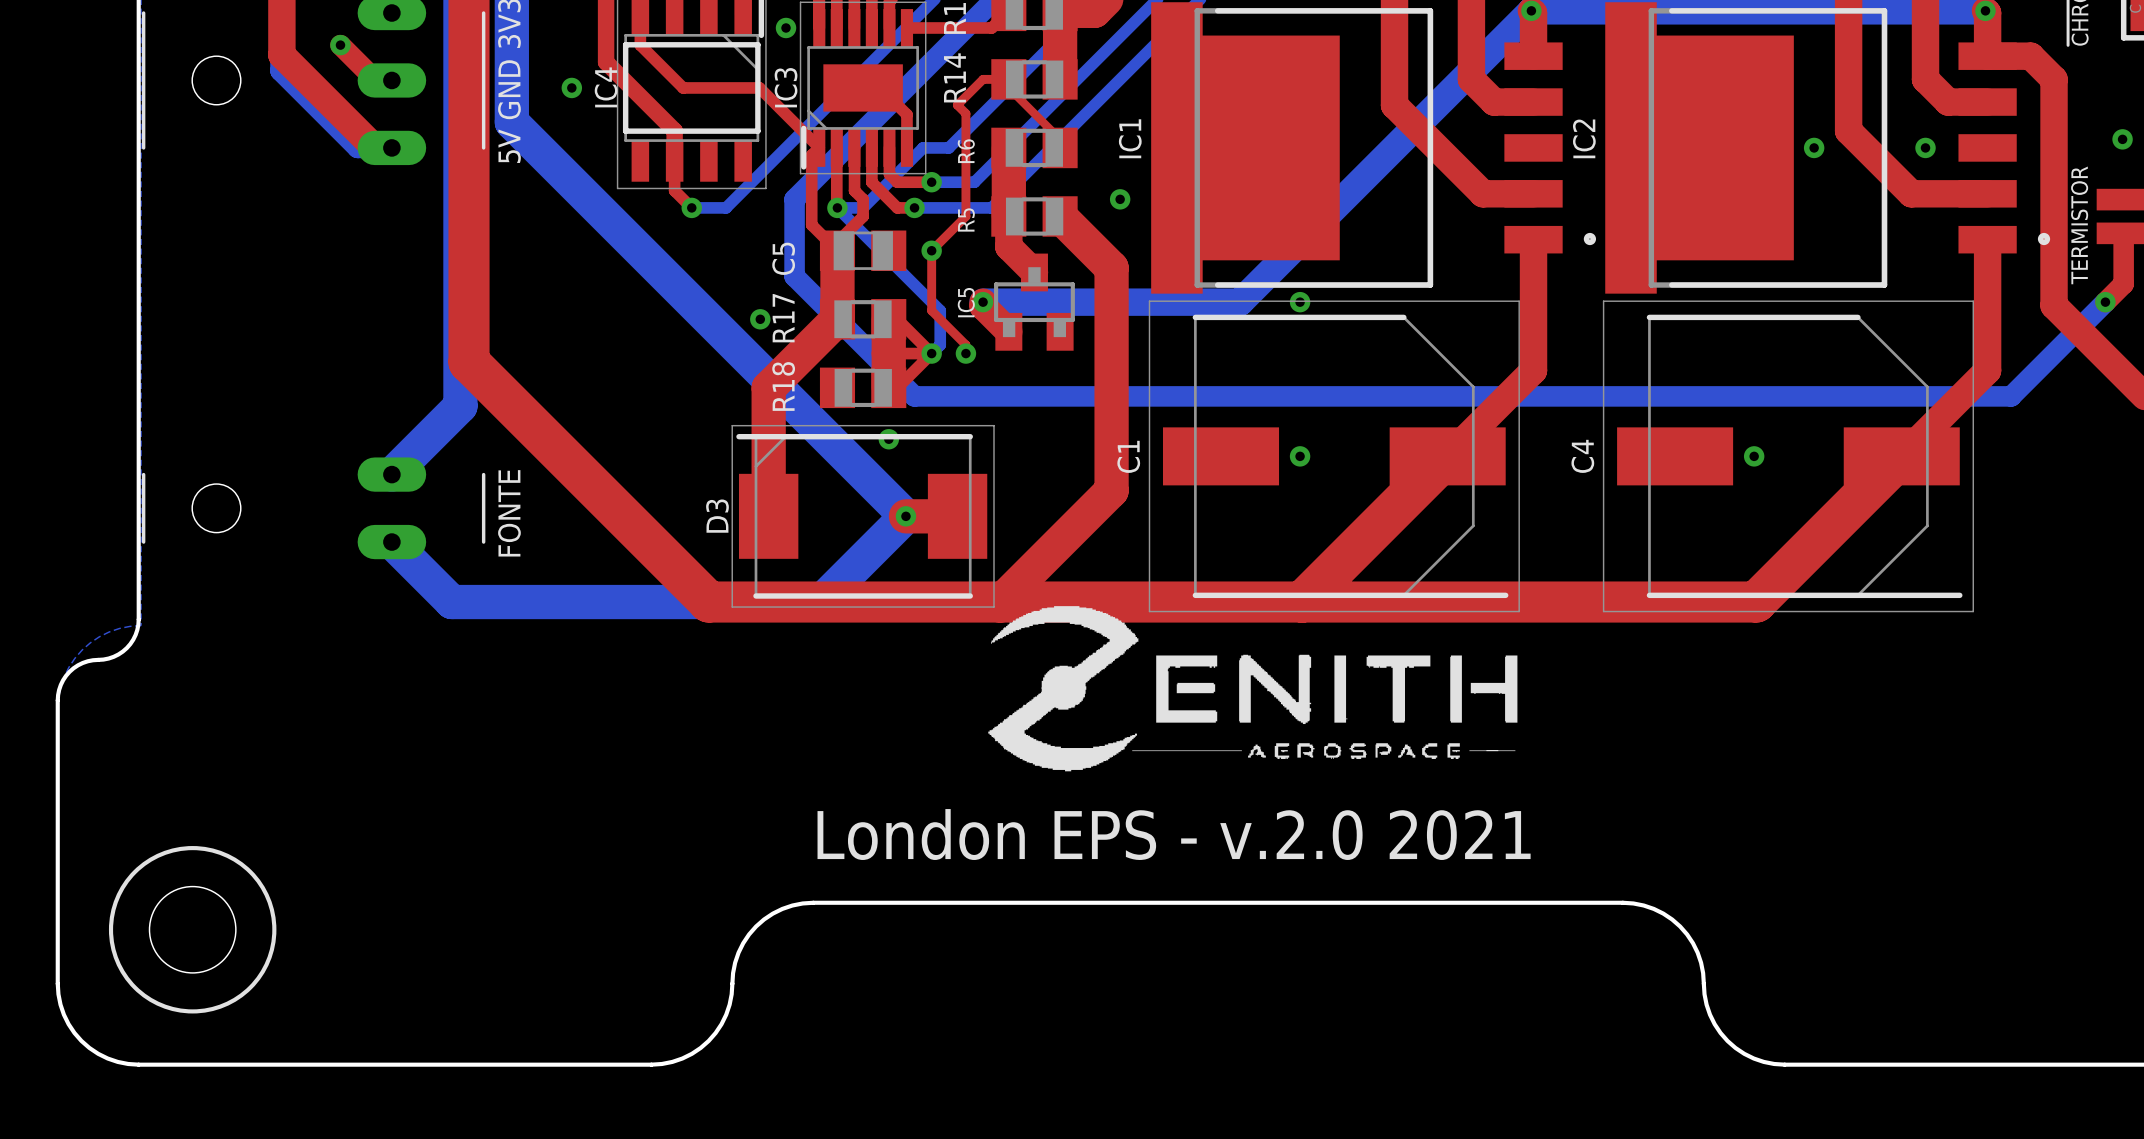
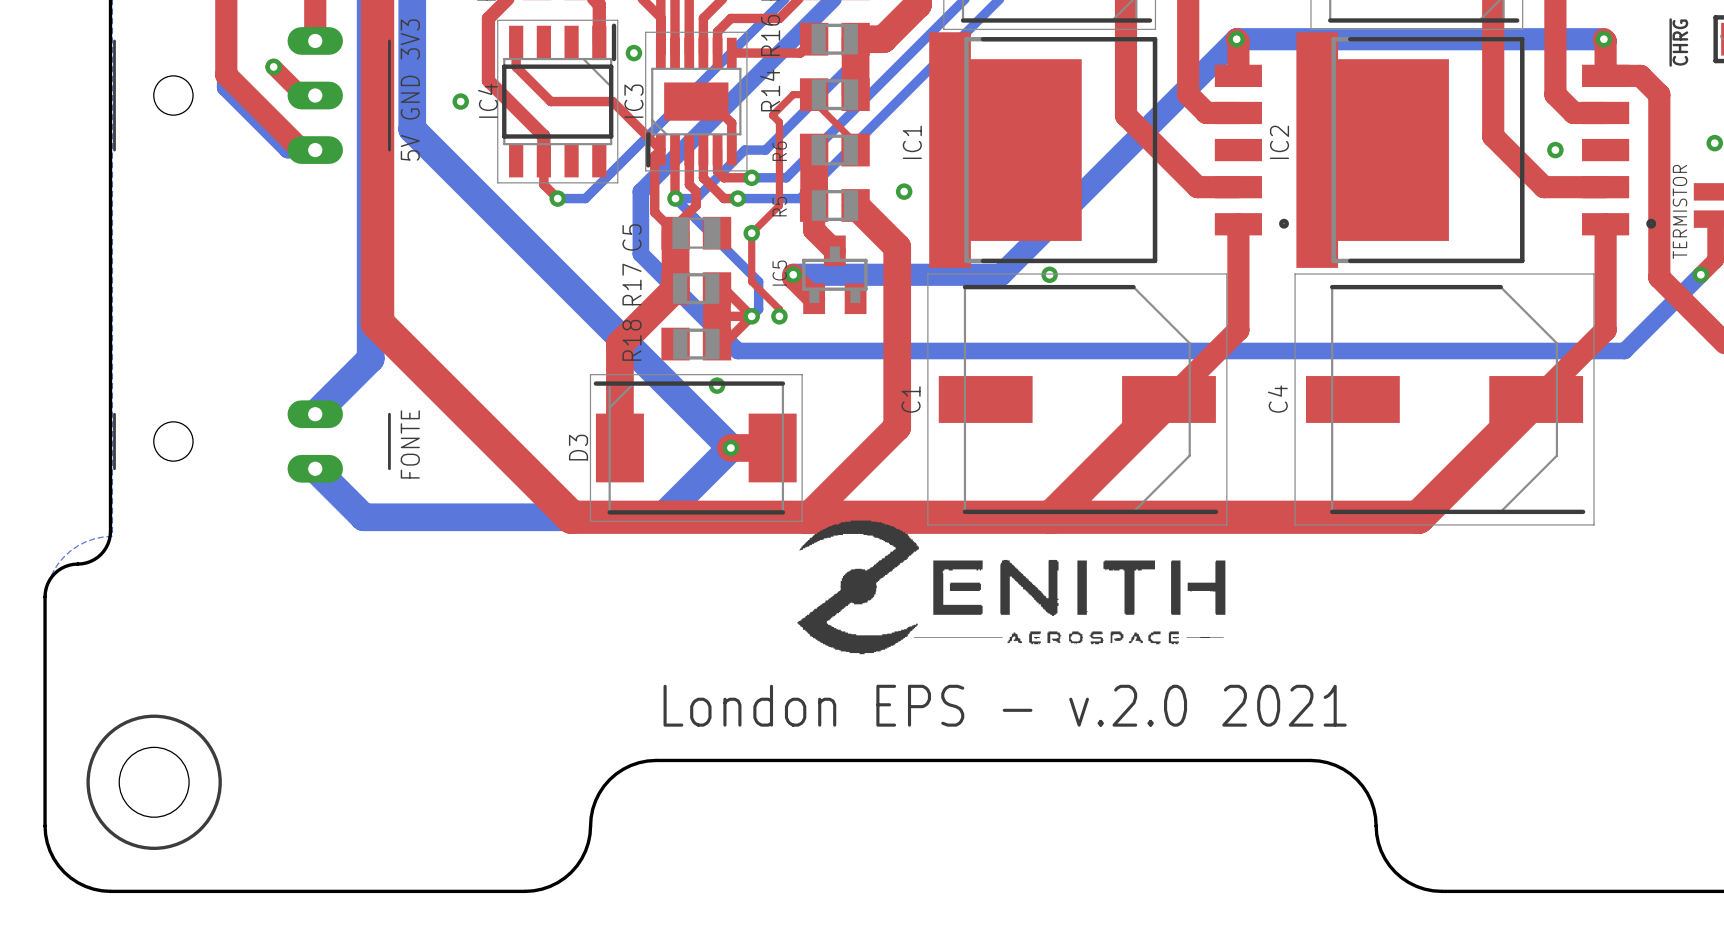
via: (1814, 147) -> none
via: (760, 319) -> none
via: (1300, 456) -> none
via: (1754, 456) -> none

